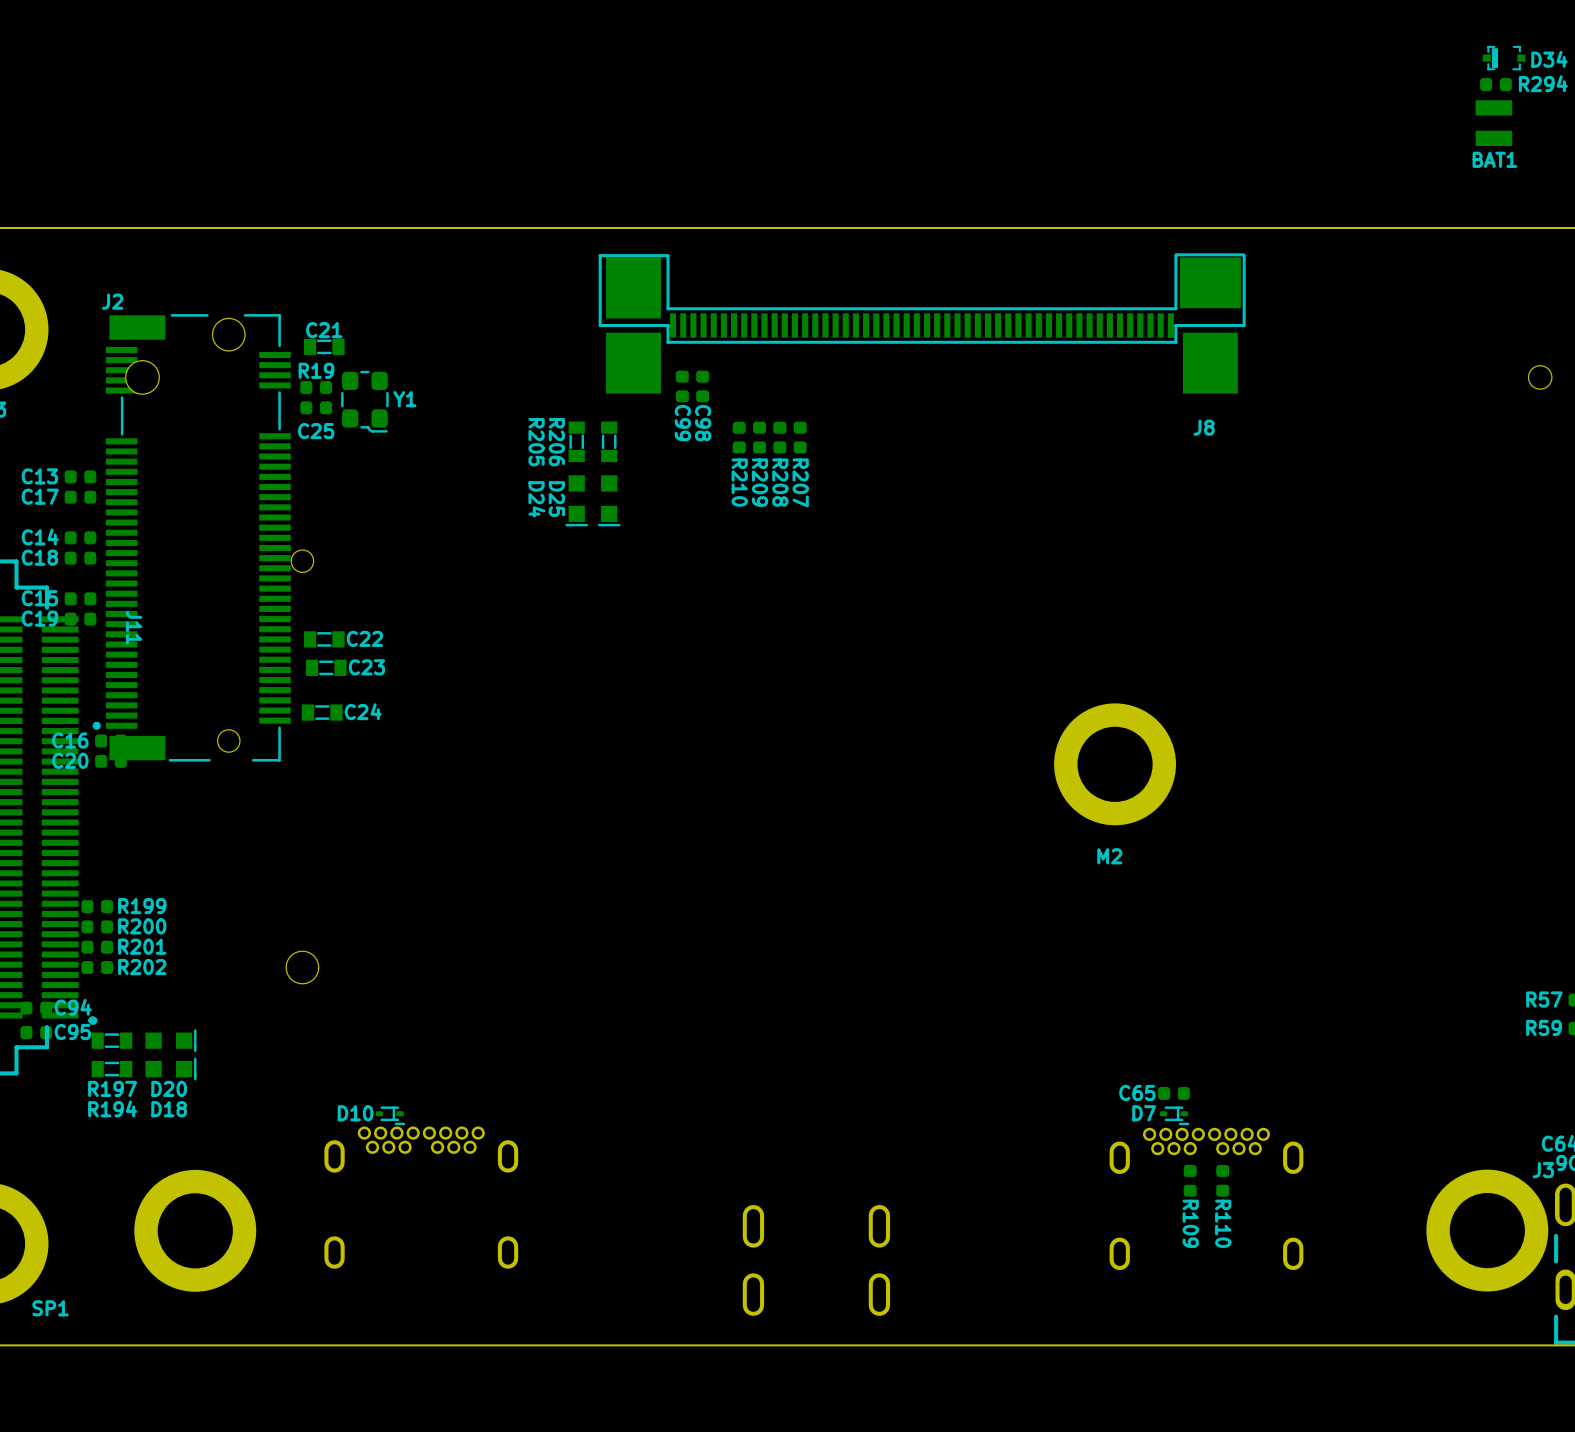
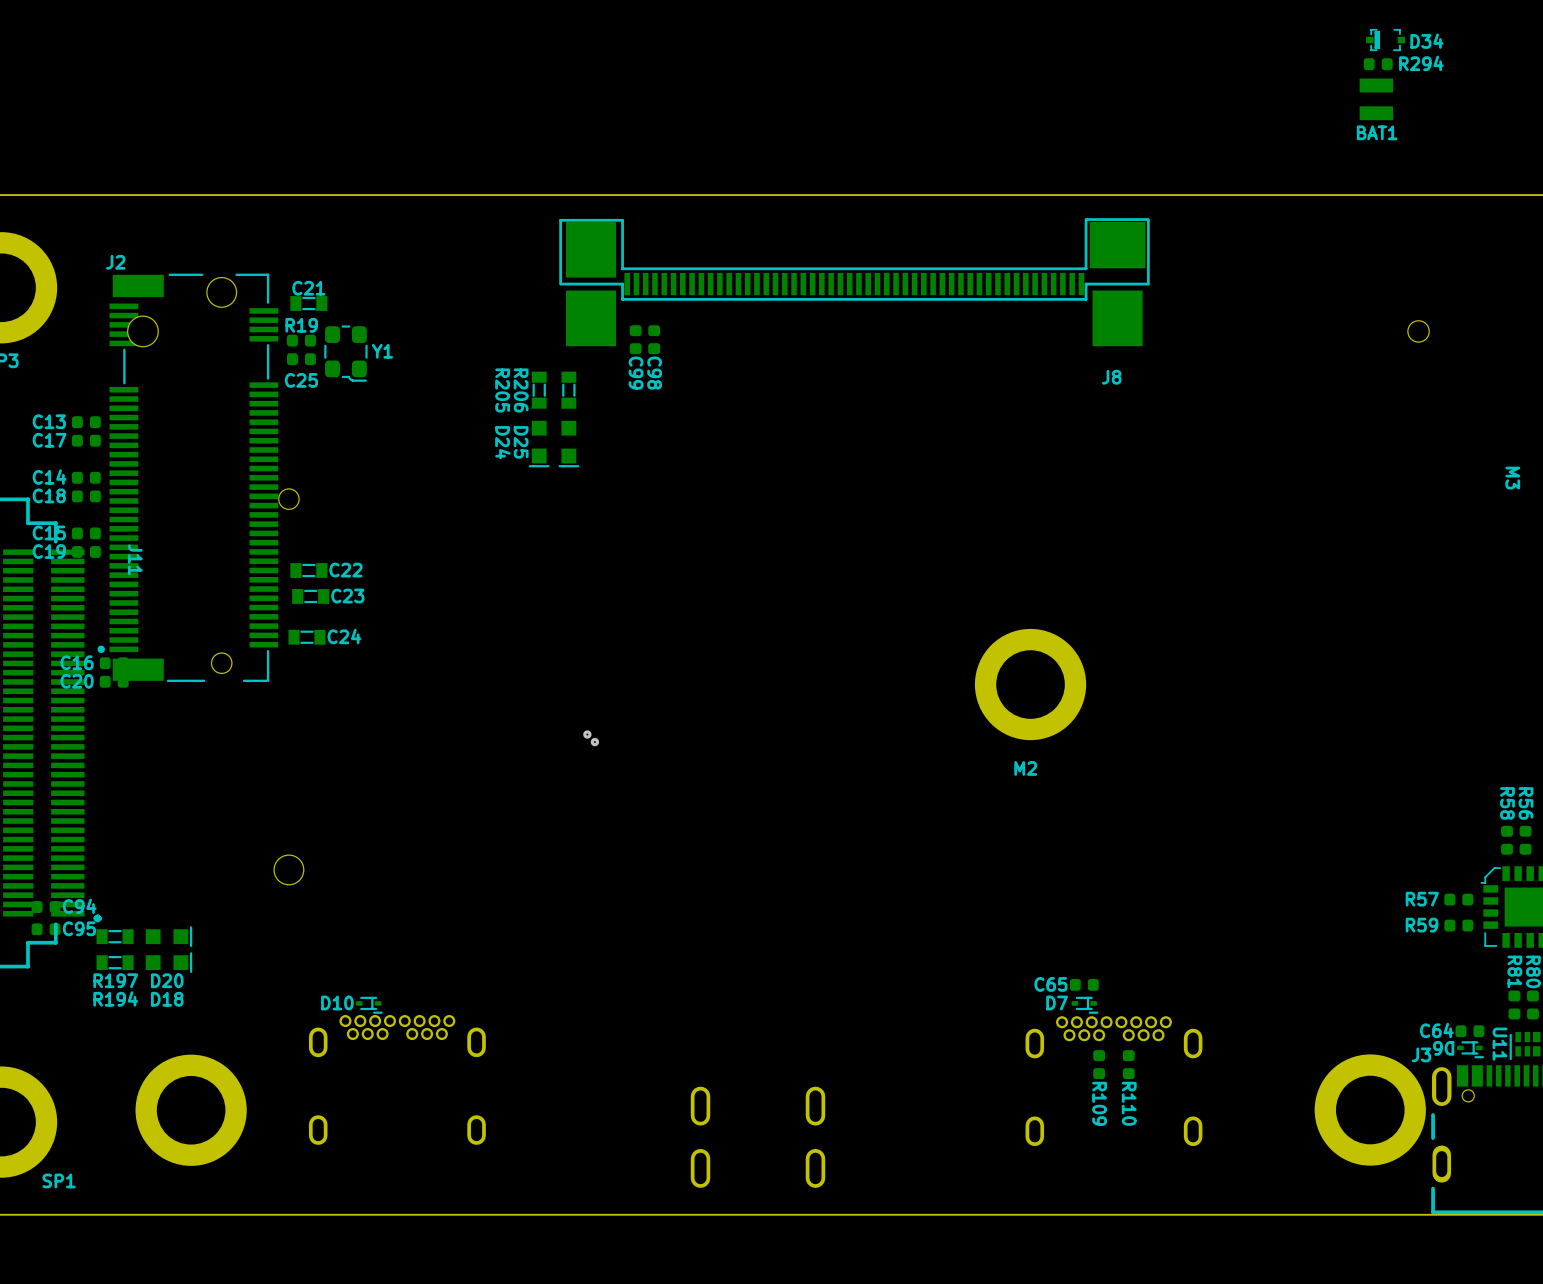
R210: (739, 437) -> none
R209: (759, 437) -> none
R208: (779, 437) -> none
R207: (800, 437) -> none
via: none -> (587, 734)
via: none -> (594, 742)
R199: (97, 906) -> none
R200: (97, 926) -> none
R201: (97, 947) -> none
R202: (97, 967) -> none

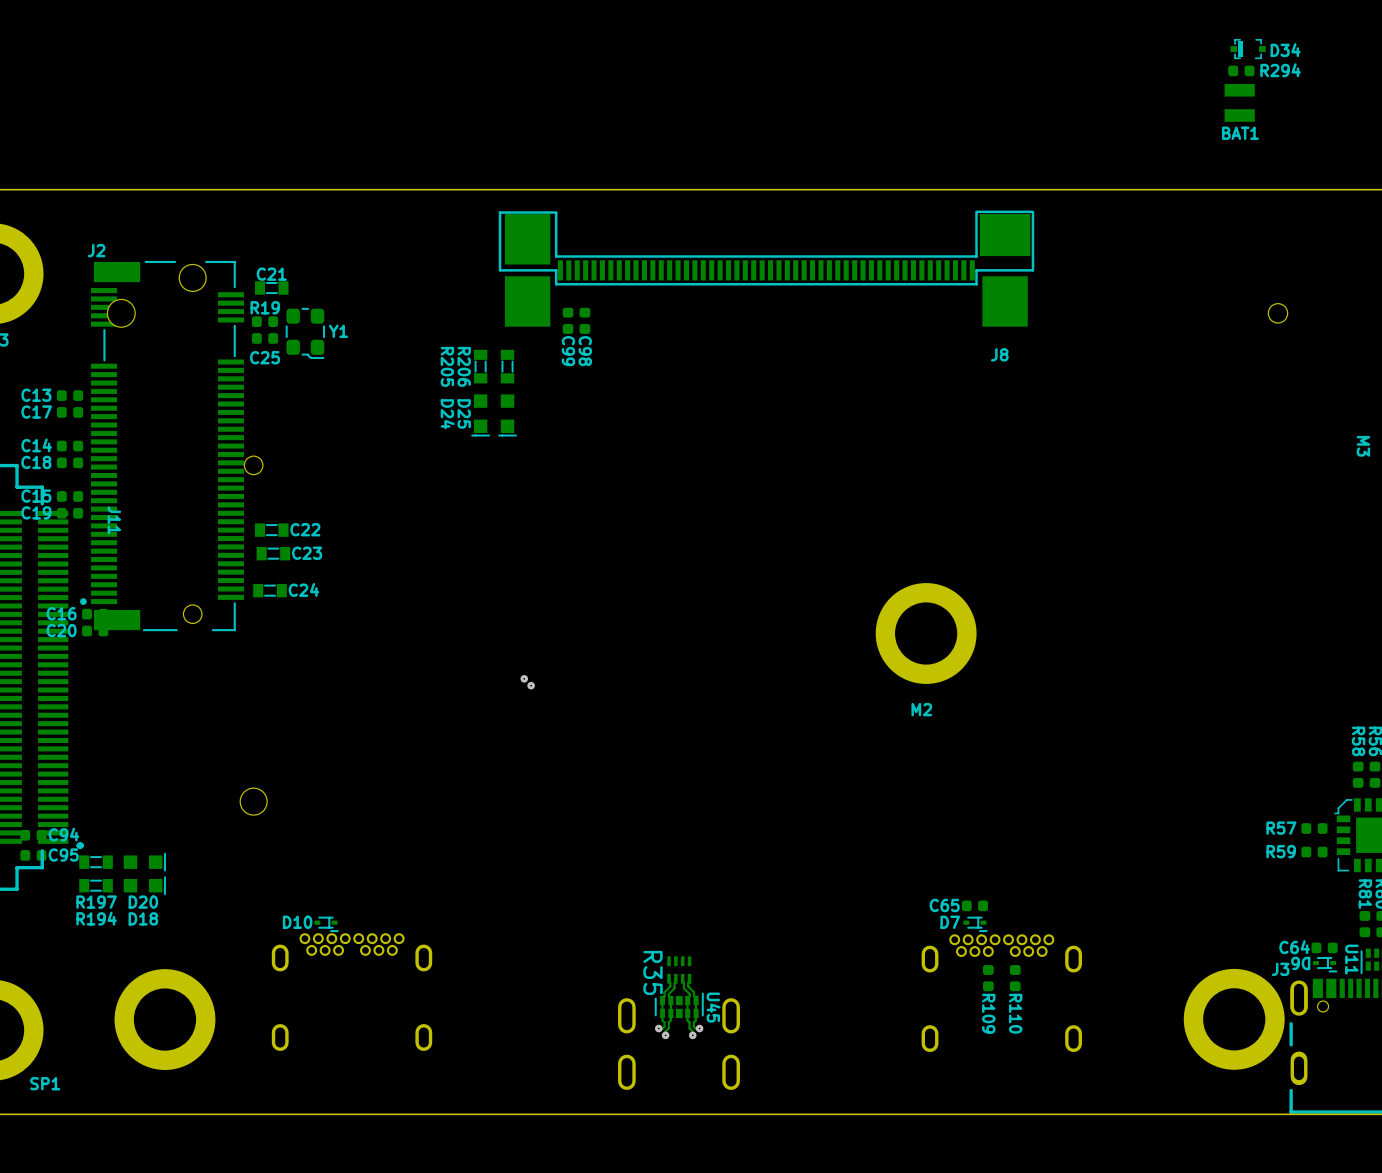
R35: none -> (679, 970)
track: none -> (669, 978) (670, 986) (664, 992) (662, 998) (662, 1020) (664, 1026) (658, 1028)
track: none -> (675, 978) (674, 988) (668, 994) (670, 998) (670, 1020) (665, 1035)
track: none -> (682, 978) (683, 988) (689, 994) (687, 998) (687, 1020) (692, 1035)
track: none -> (689, 978) (688, 986) (694, 992) (695, 998) (695, 1020) (693, 1026) (699, 1028)
U45: none -> (679, 1005)
via: none -> (658, 1028)
via: none -> (699, 1028)
via: none -> (665, 1035)
via: none -> (692, 1035)

